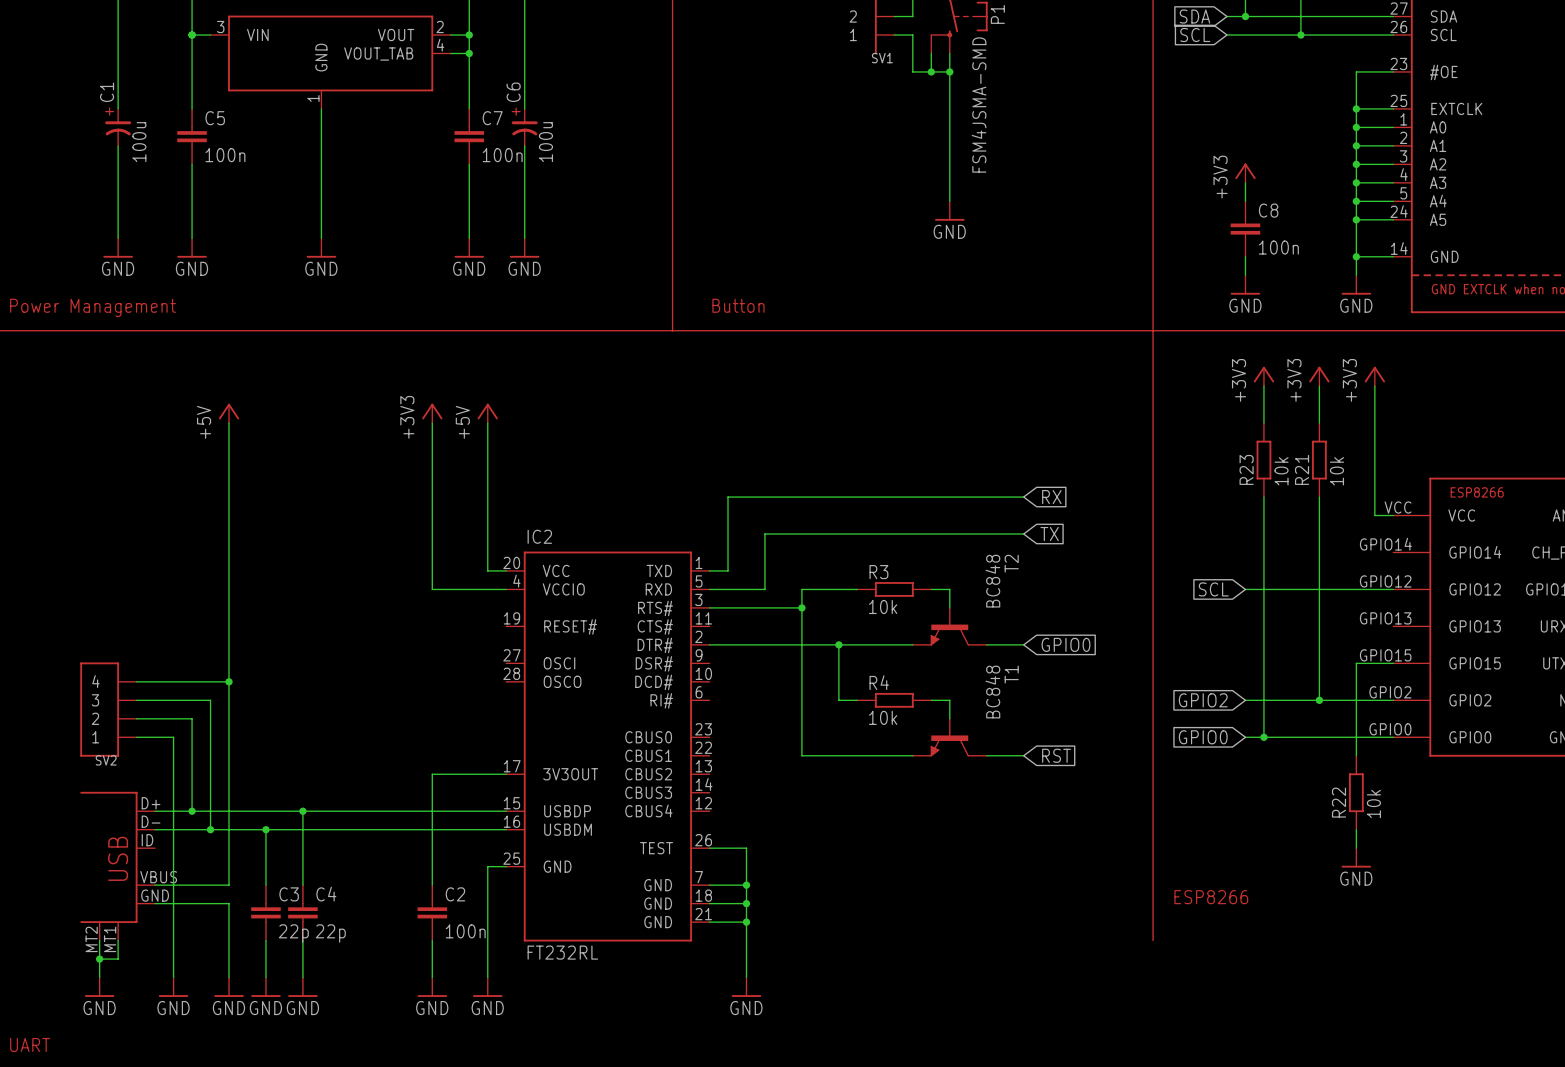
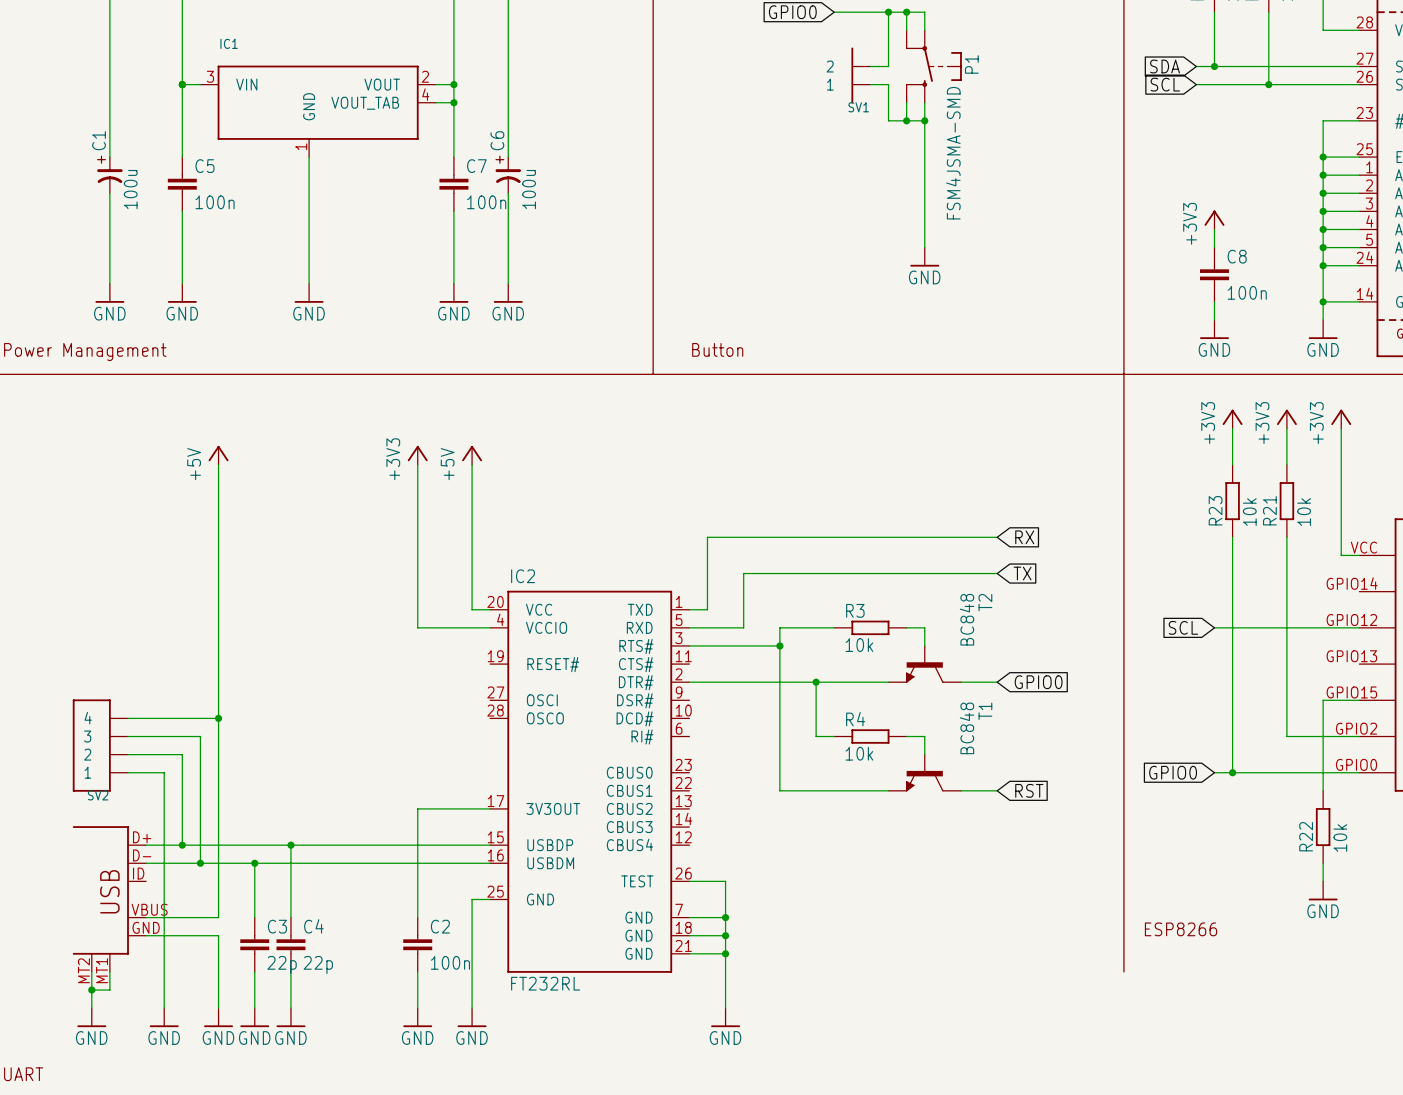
global label: GPIO2 (1203, 700) -> none
wire: (1245, 700) (1319, 700) -> none
junction: (1319, 700) -> none

